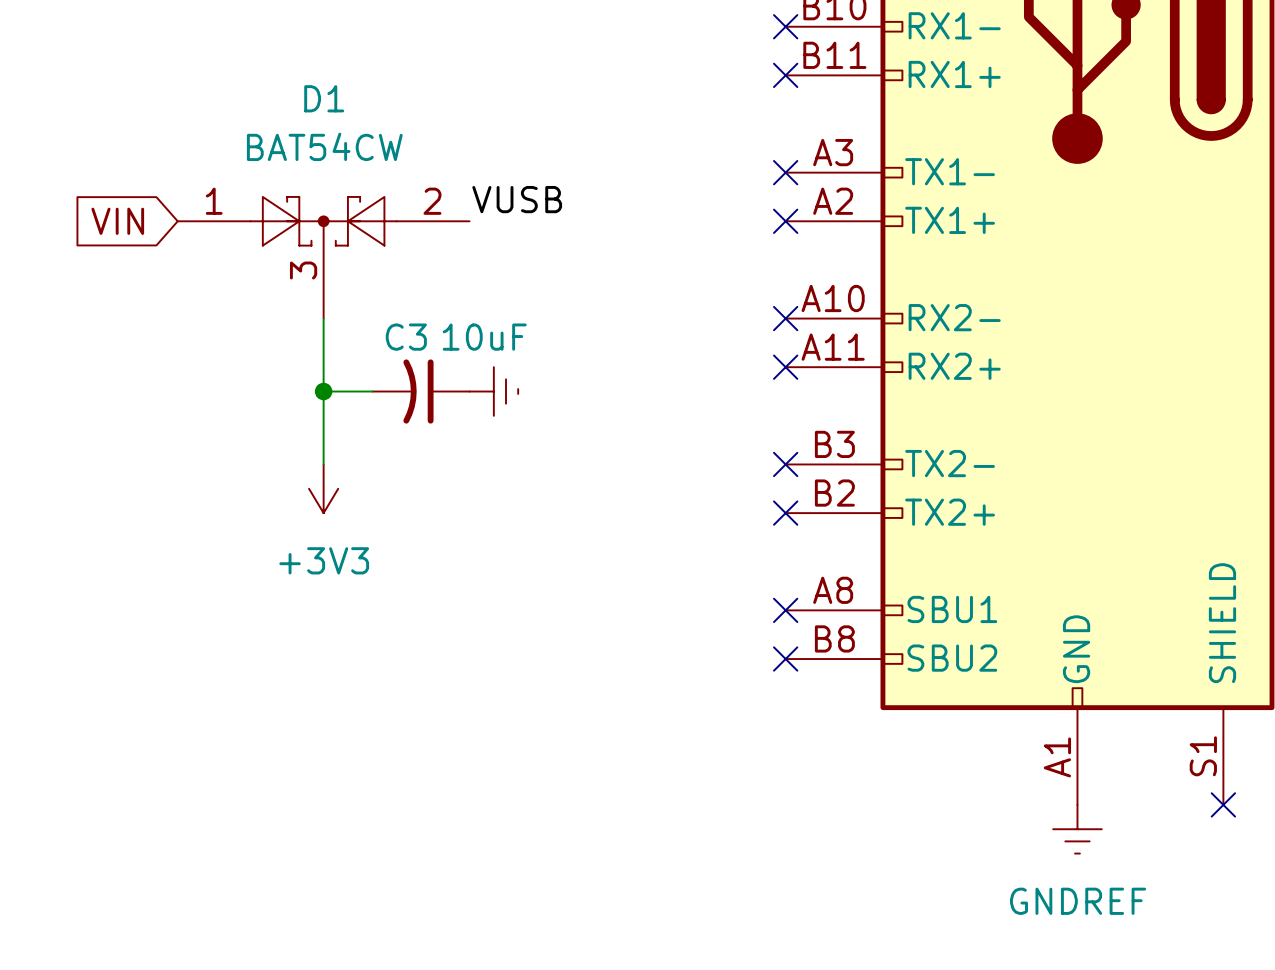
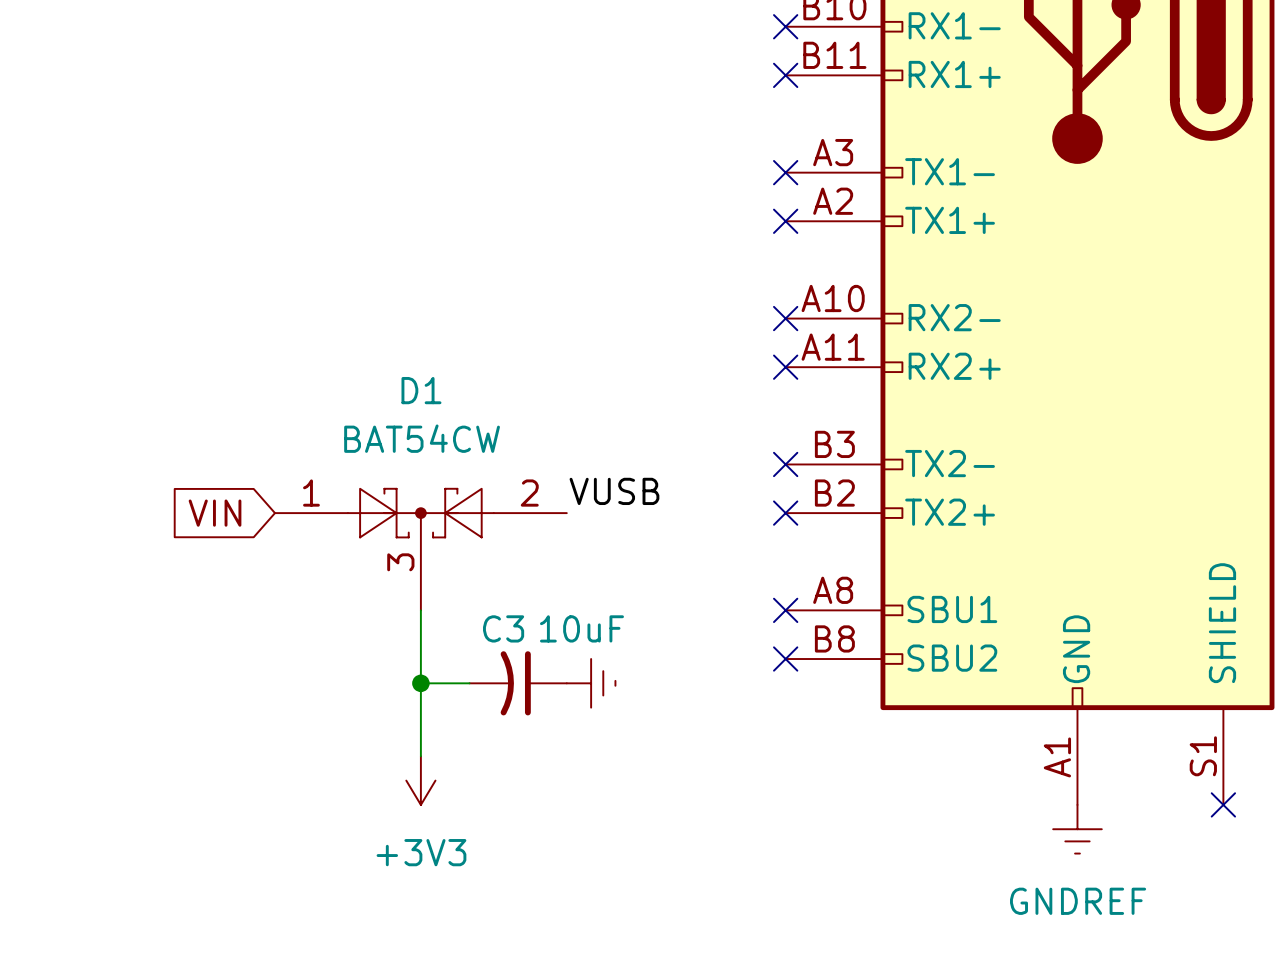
label position: VUSB (517, 199) -> VUSB (614, 491)
global label position: VIN (117, 221) -> VIN (215, 513)
D1 position: (323, 257) -> (420, 549)
wire: (323, 318) (323, 464) -> (420, 610) (420, 756)
wire: (323, 391) (372, 391) -> (420, 683) (469, 683)
junction: (323, 391) -> none
C3 position: (420, 391) -> (518, 683)
power symbol position: (493, 391) -> (591, 683)
power symbol position: +3V3 (323, 488) -> +3V3 (420, 780)
junction: none -> (420, 683)

